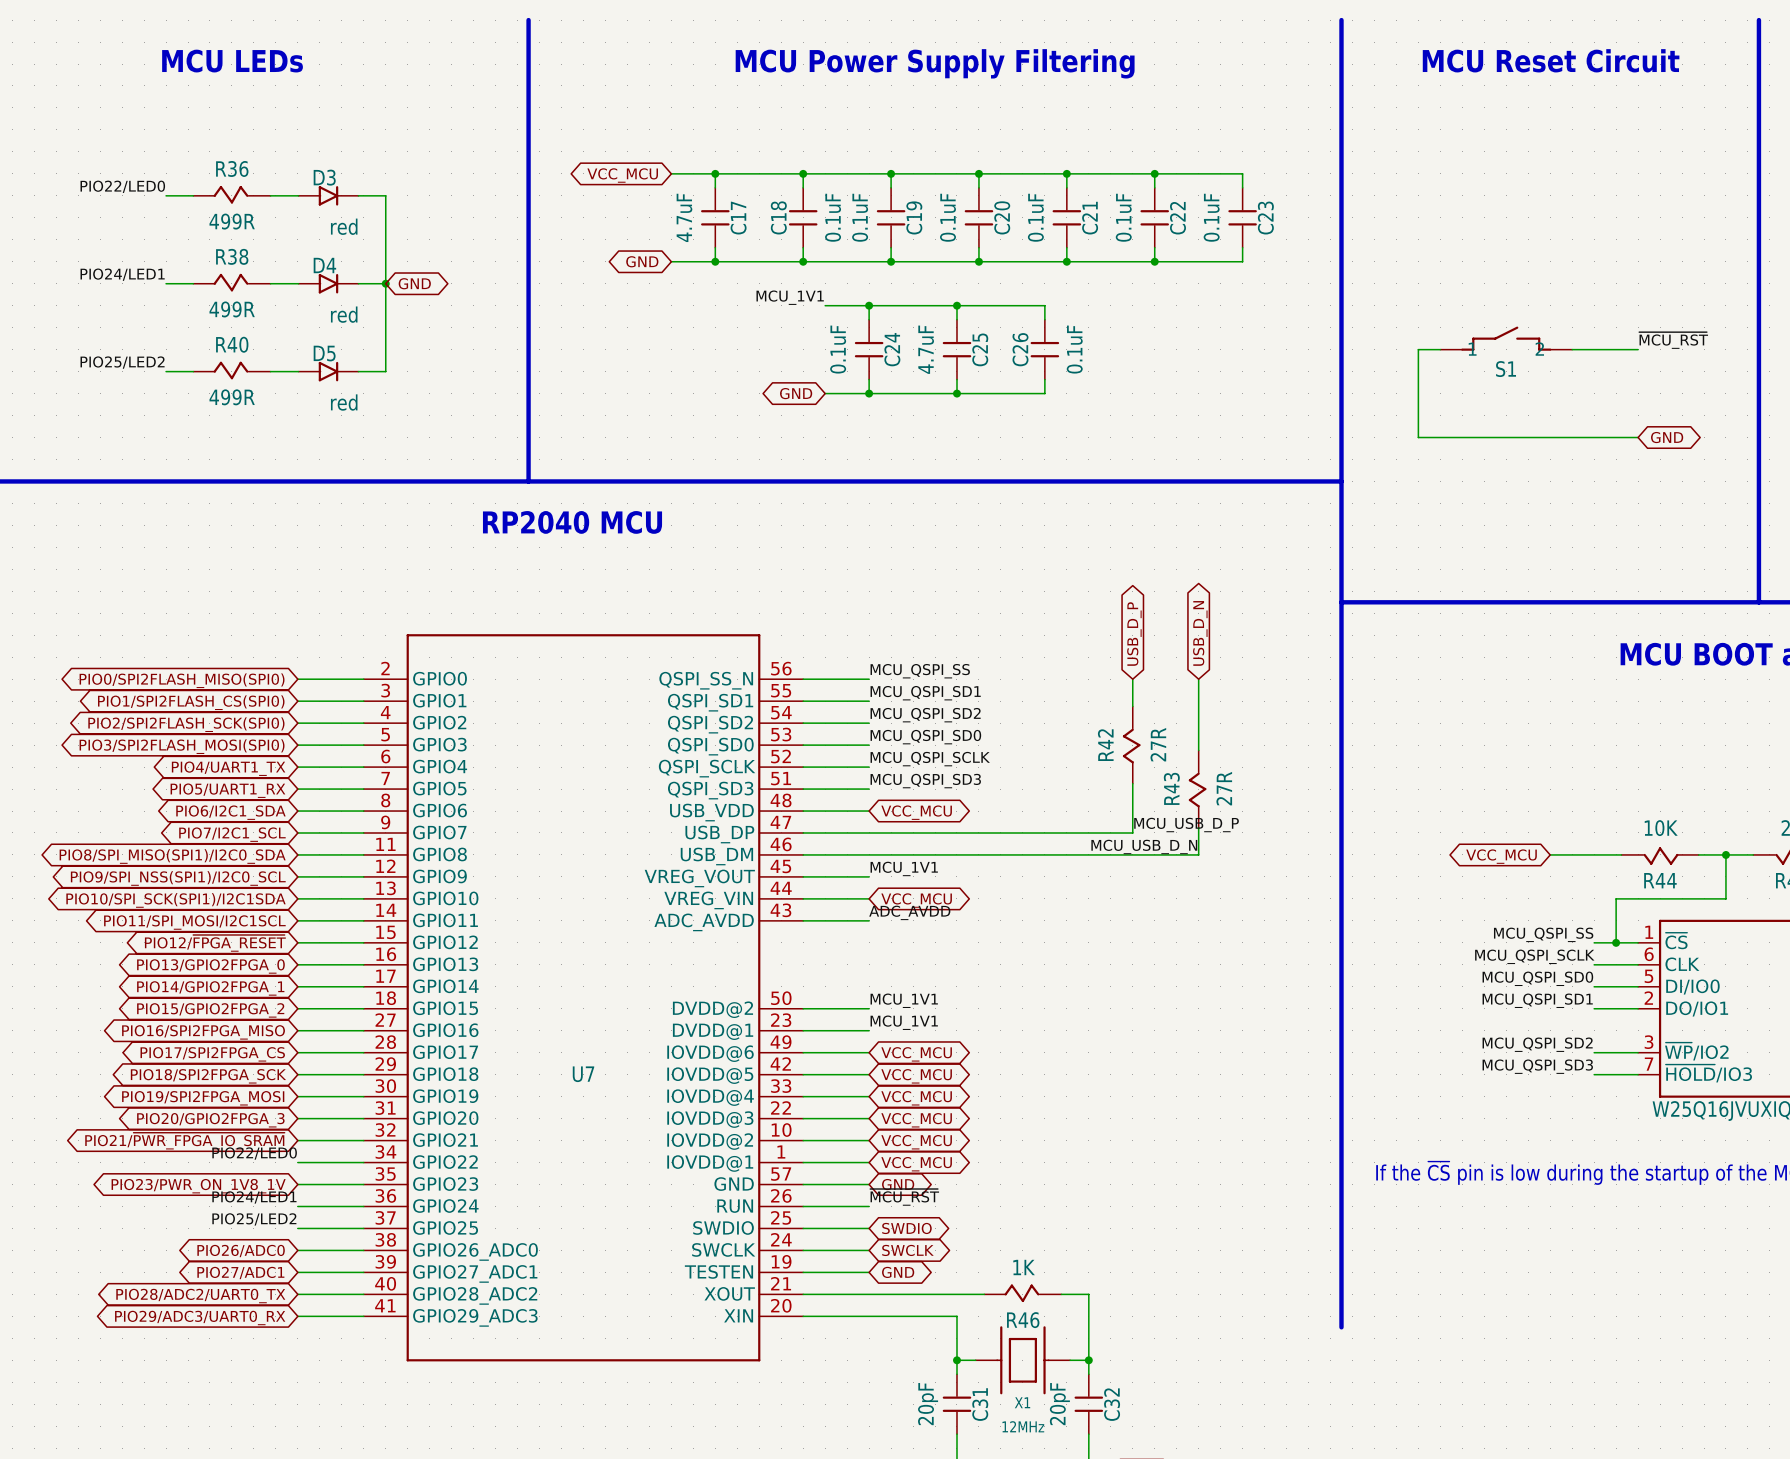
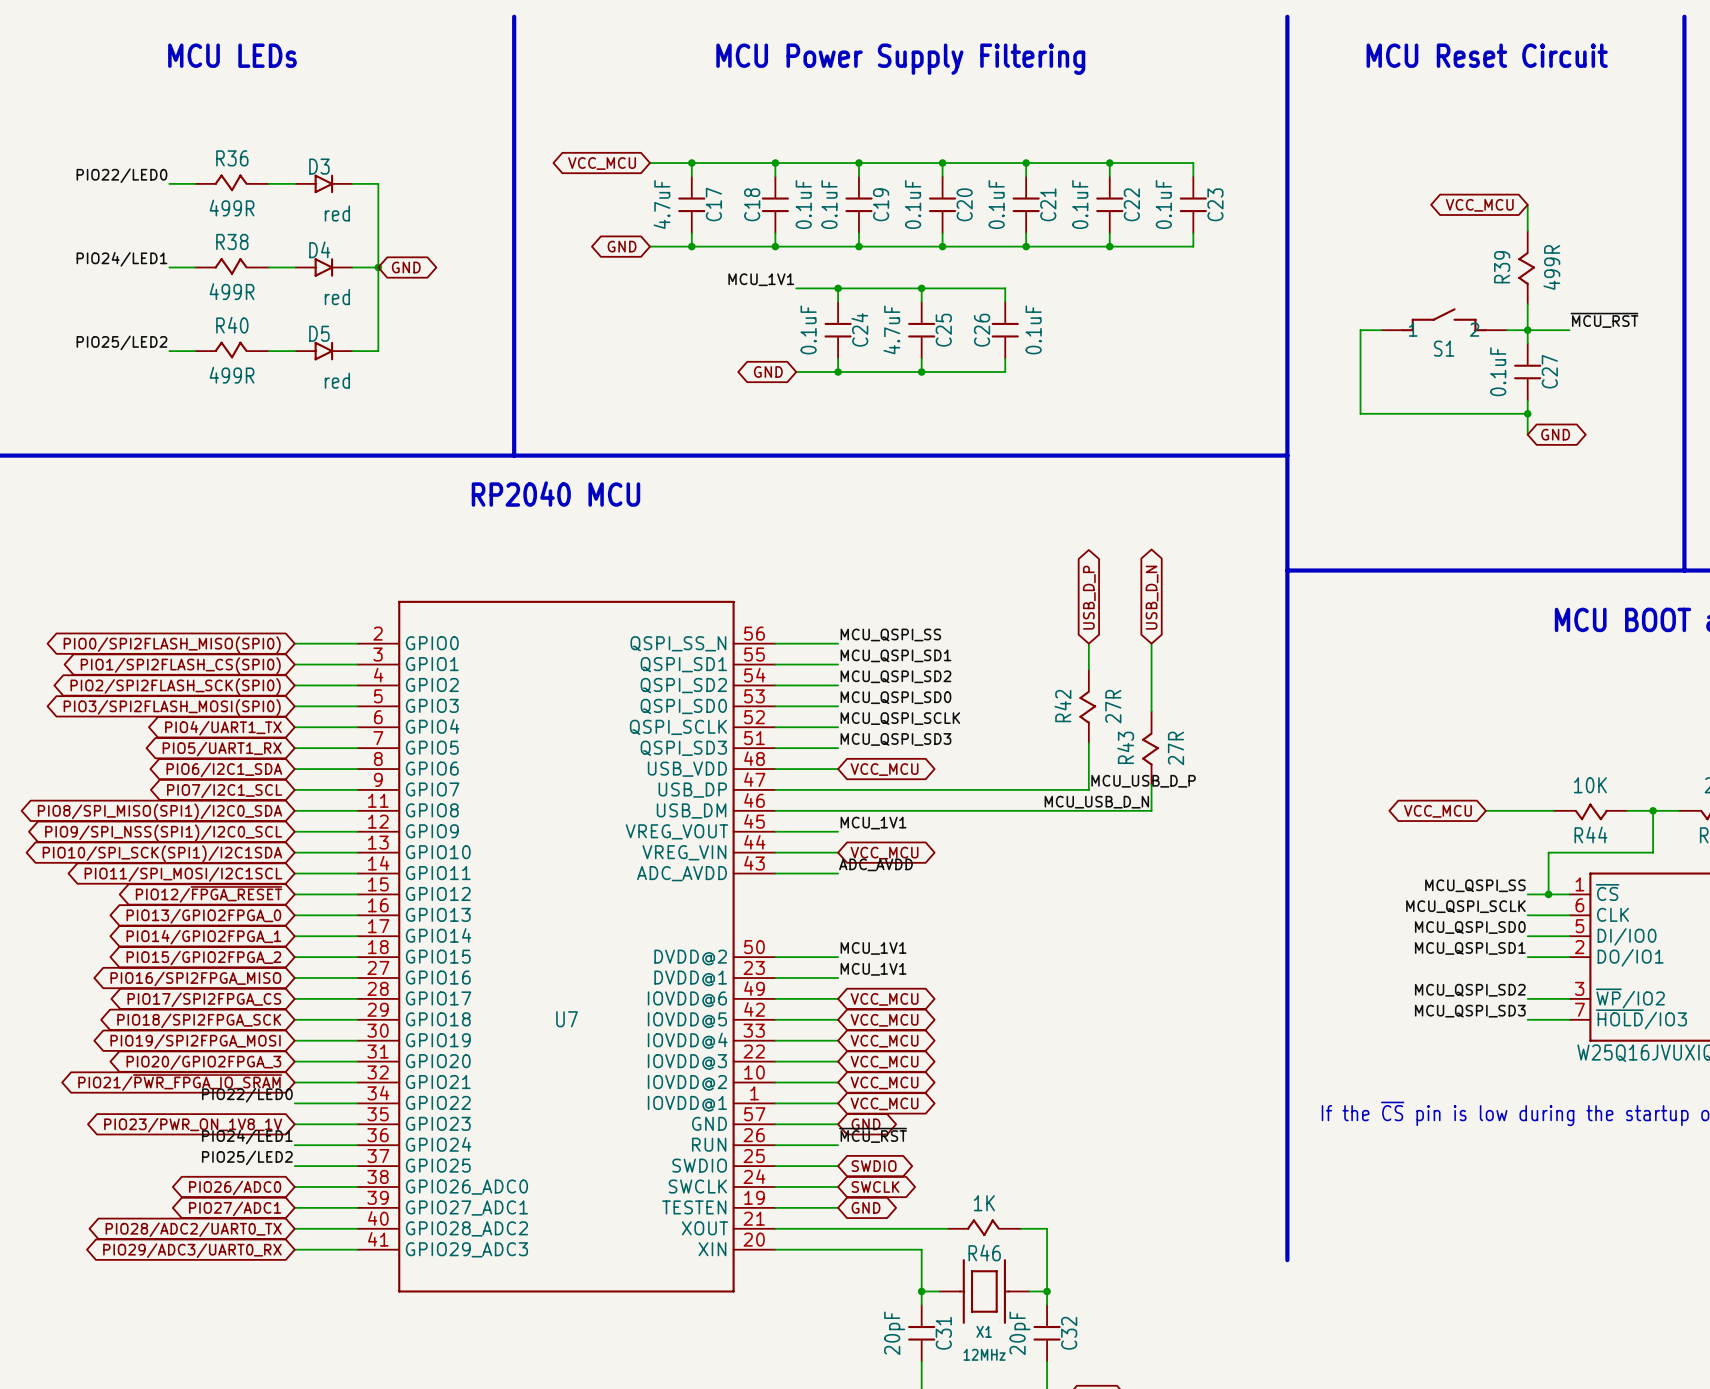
wire: none -> (1527, 204) (1527, 230)
global label: none -> VCC_MCU (1479, 205)
R39: none -> 499R (1526, 267)
wire: none -> (1527, 304) (1527, 343)
junction: none -> (1527, 330)
C27: none -> 0.1uF (1527, 371)
wire: none -> (1527, 400) (1527, 434)
wire: (1594, 437) (1638, 437) -> none
junction: none -> (1527, 413)
global label position: GND (1667, 437) -> GND (1555, 434)

